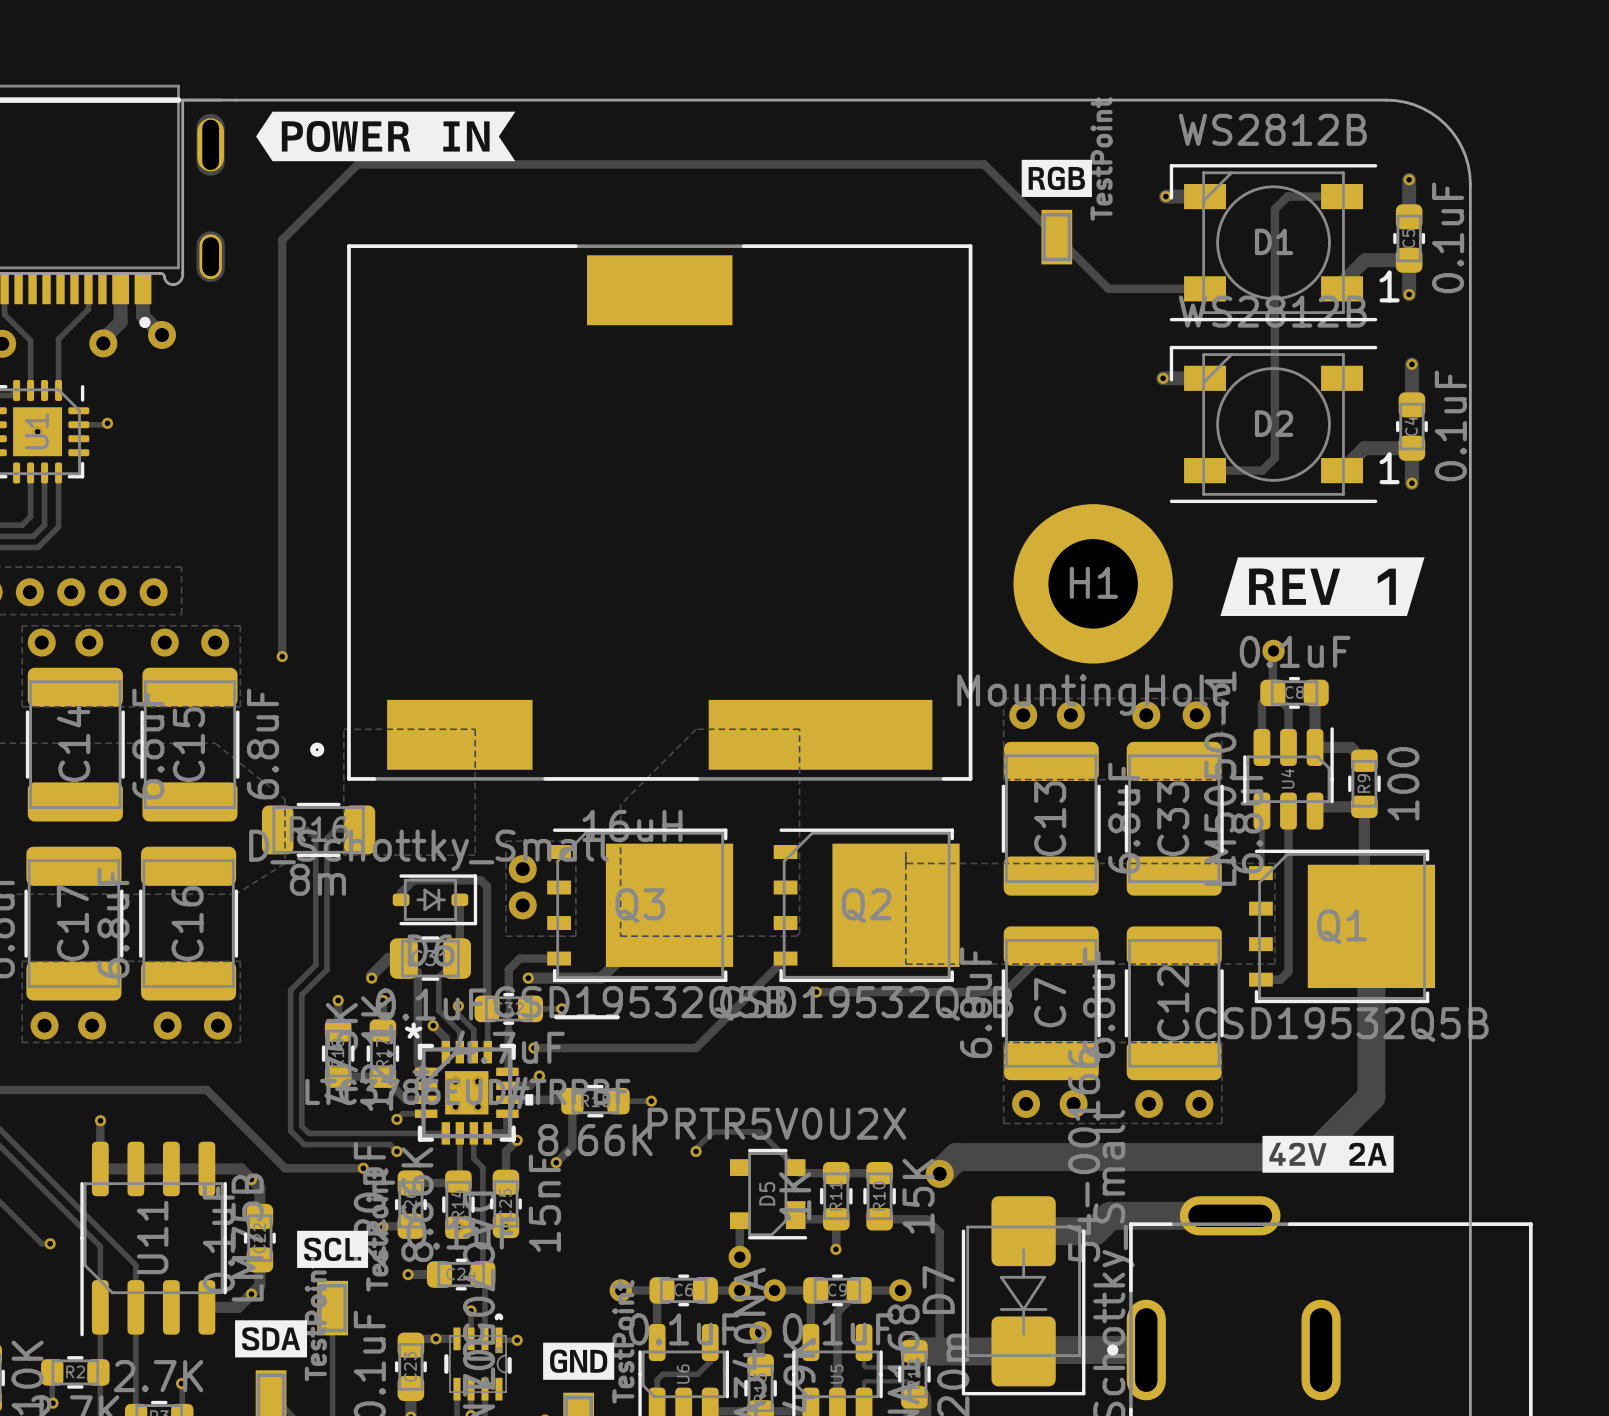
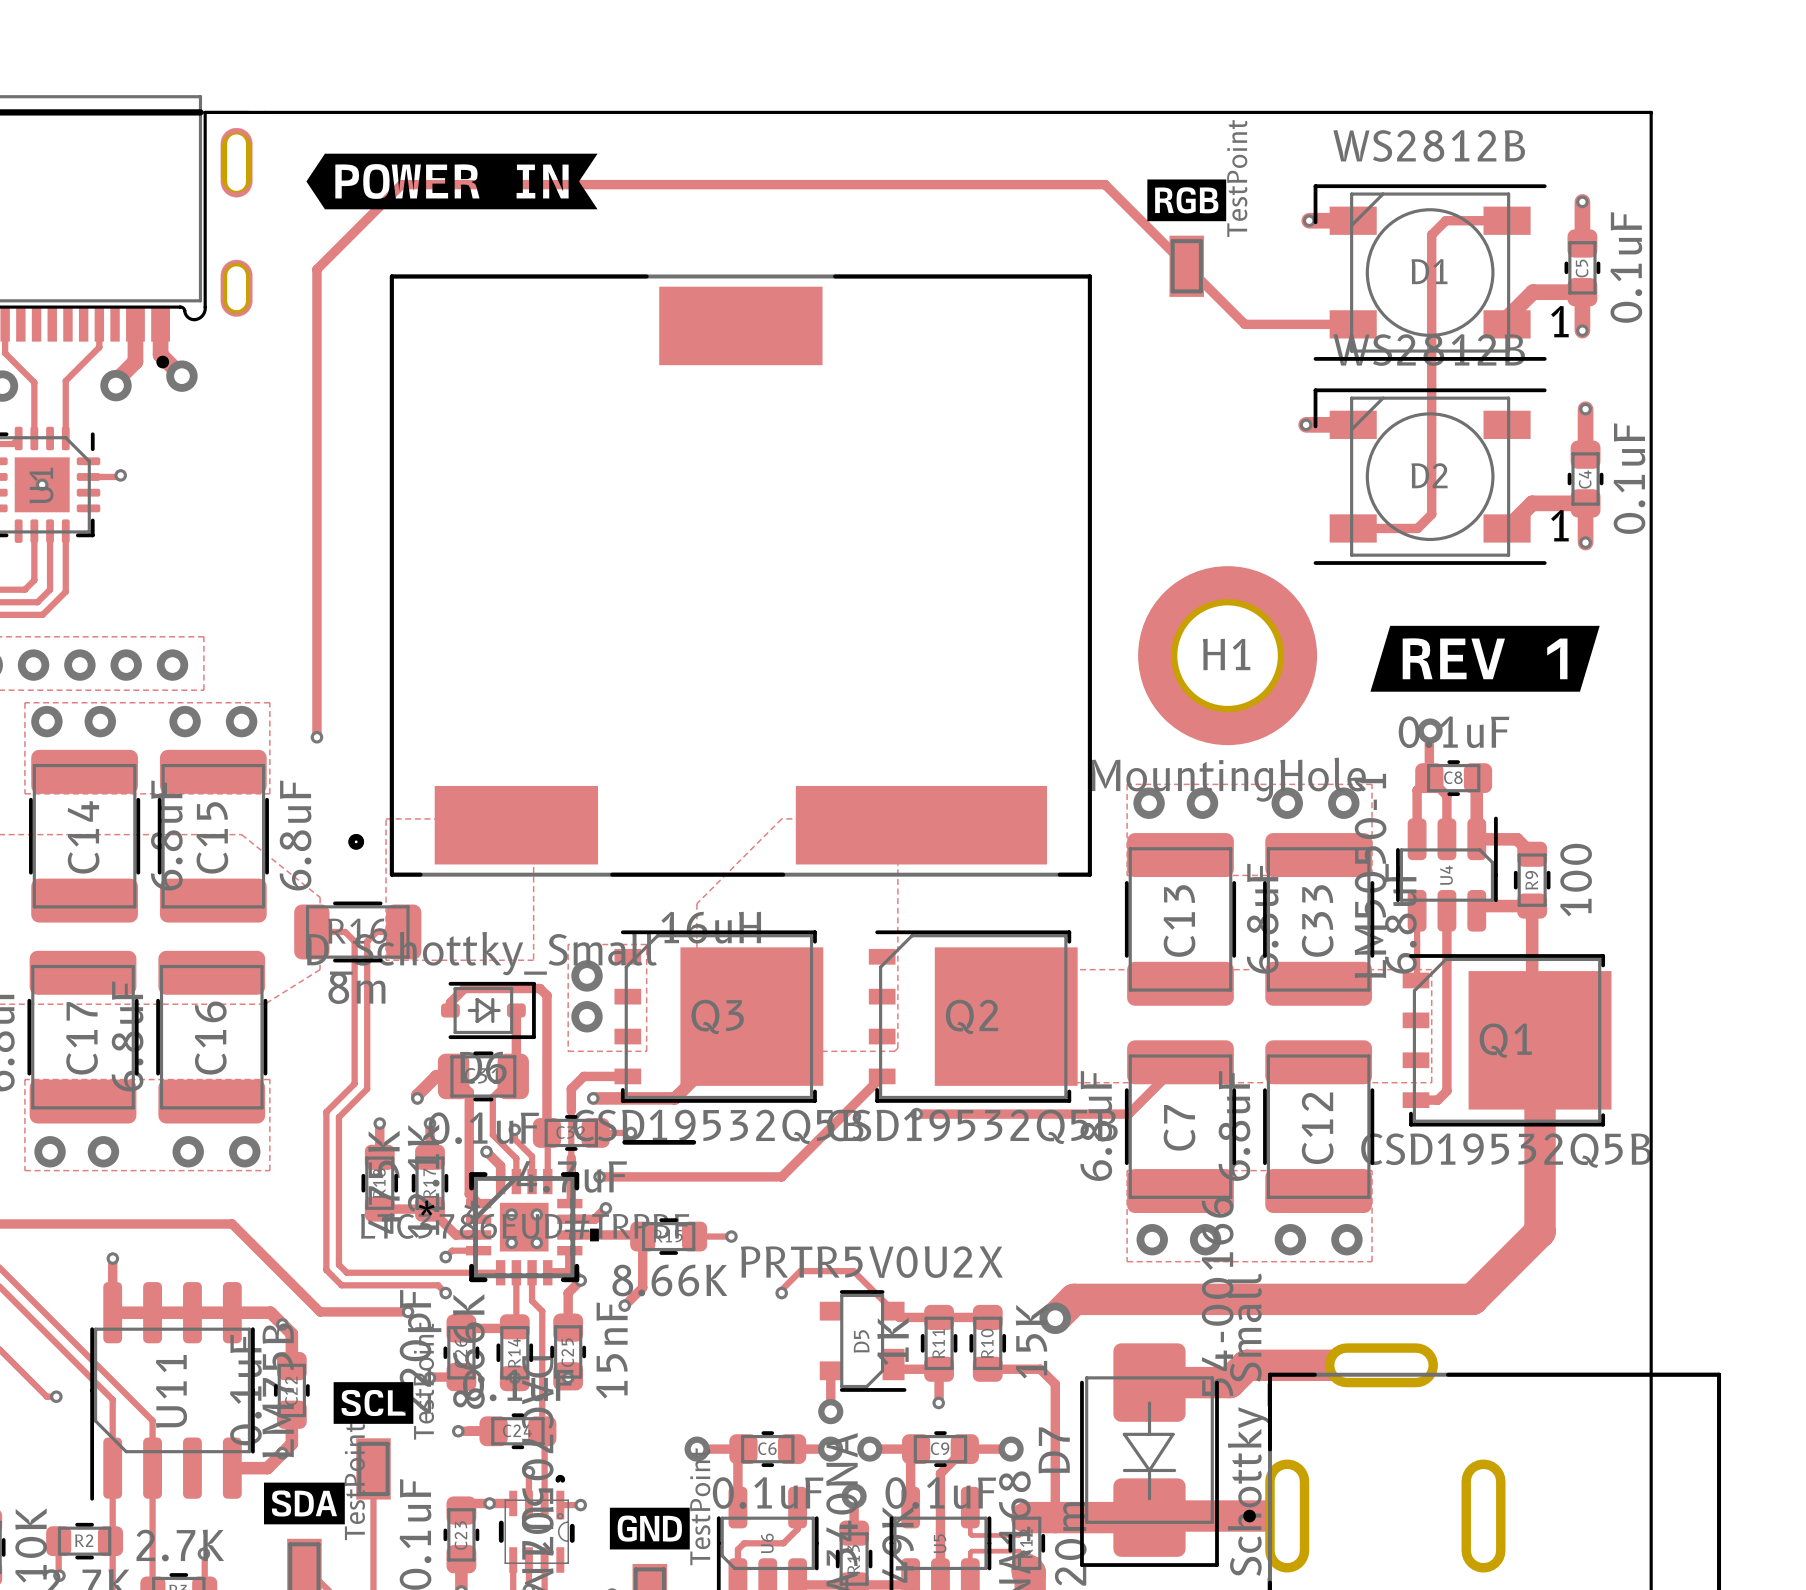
board edge: (1386, 100) (1405, 102) (1422, 108) (1445, 124) (1462, 147) (1468, 165) (1470, 183) -> (1556, 112) (1651, 112) (1651, 206)
drawing position: (385, 136) -> (451, 181)
part text position: * (413, 1030) -> * (426, 1208)
drawing: [1262, 1135, 1394, 1173] -> none

